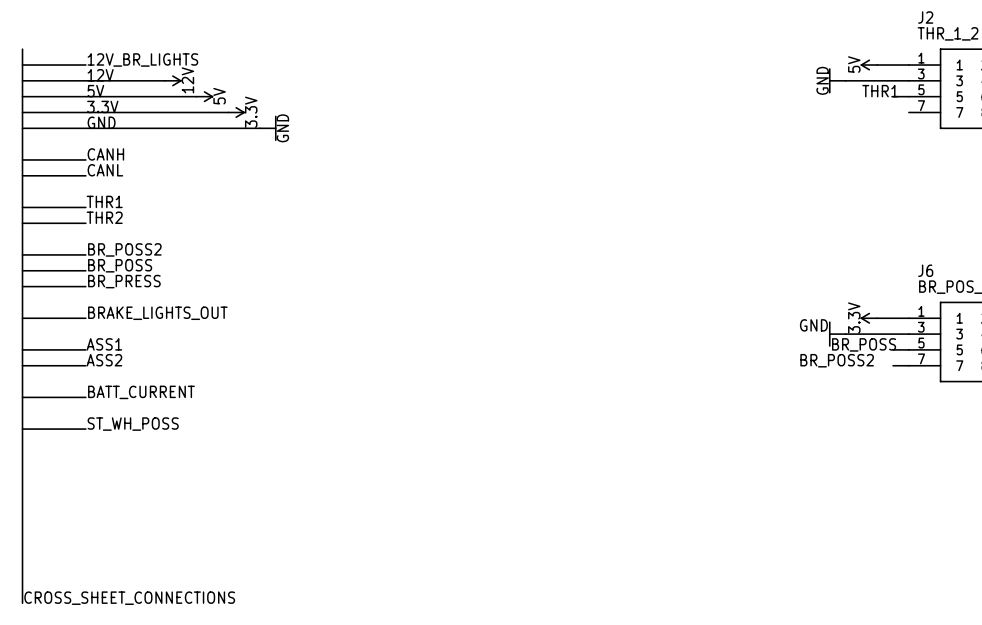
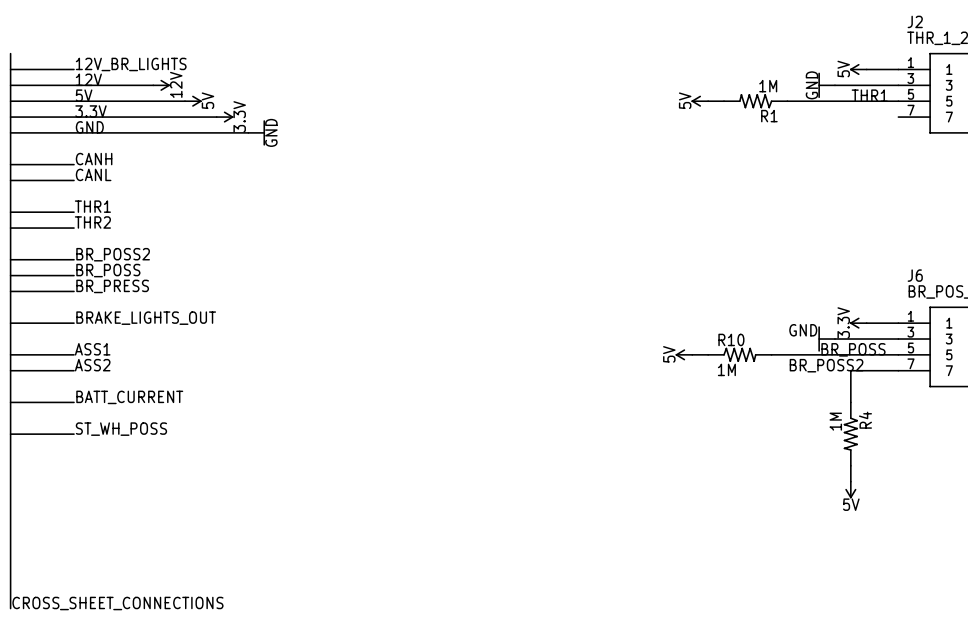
power symbol: none -> 5V (699, 101)
wire: none -> (708, 101) (724, 101)
R1: none -> 1M (755, 101)
wire: none -> (787, 101) (882, 101)
power symbol: none -> 5V (683, 354)
wire: none -> (692, 354) (708, 354)
R10: none -> 1M (739, 354)
wire: none -> (771, 354) (882, 354)
wire: none -> (882, 370) (850, 370) (850, 402)
R4: none -> 1M (850, 434)
wire: none -> (850, 465) (850, 481)
power symbol: none -> 5V (850, 490)

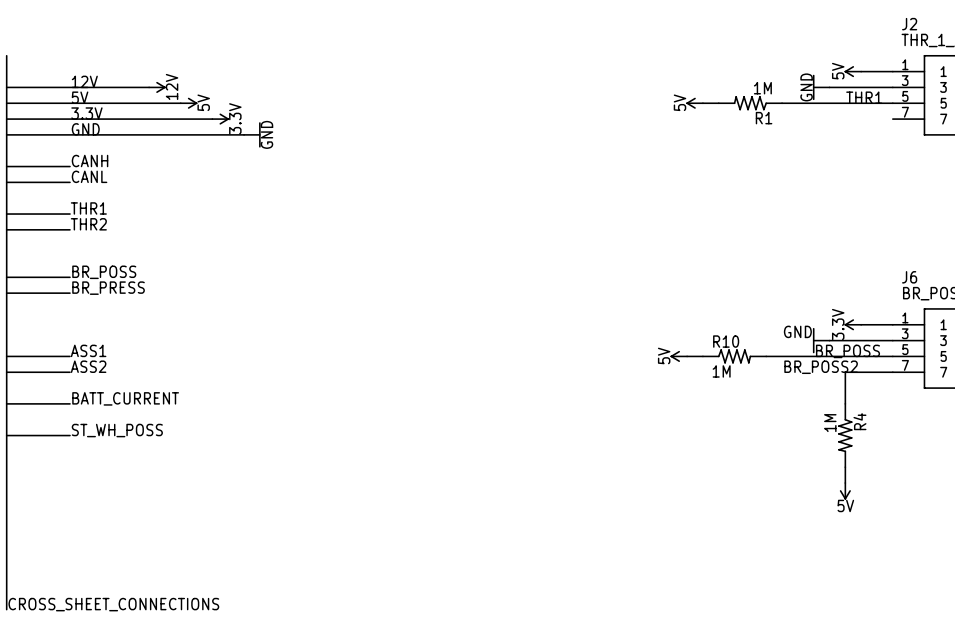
label: 12V_BR_LIGHTS (131, 64) -> none
wire: (10, 69) (74, 69) -> none
label: BR_POSS2 (113, 254) -> none
wire: (10, 259) (74, 259) -> none
label: BRAKE_LIGHTS_OUT (146, 318) -> none
wire: (10, 323) (74, 323) -> none

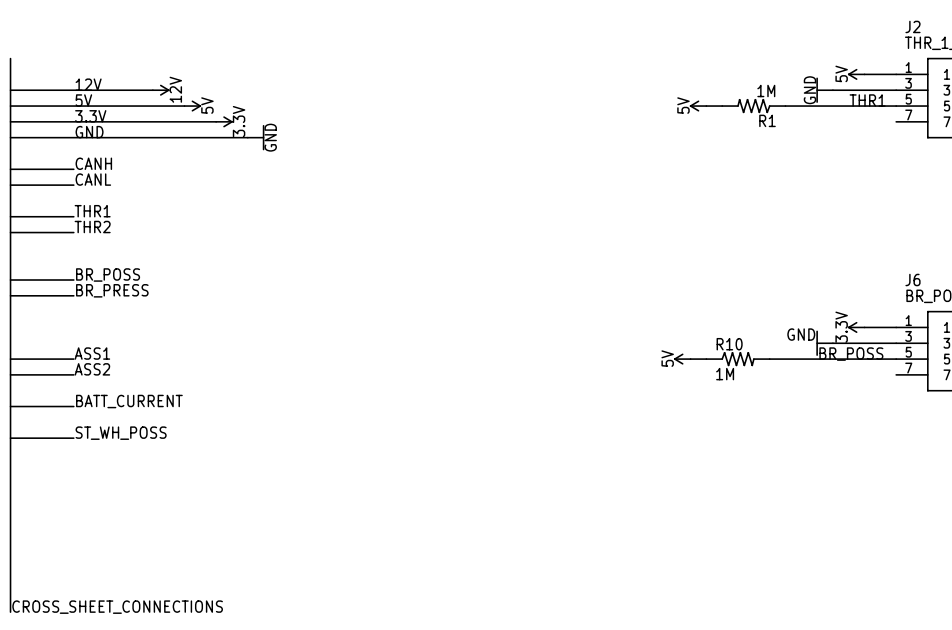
label: BR_POSS2 (821, 367) -> none
wire: (892, 372) (845, 372) (845, 403) -> none
R4: 1M (845, 435) -> none
wire: (845, 467) (845, 483) -> none
power symbol: 5V (845, 491) -> none

